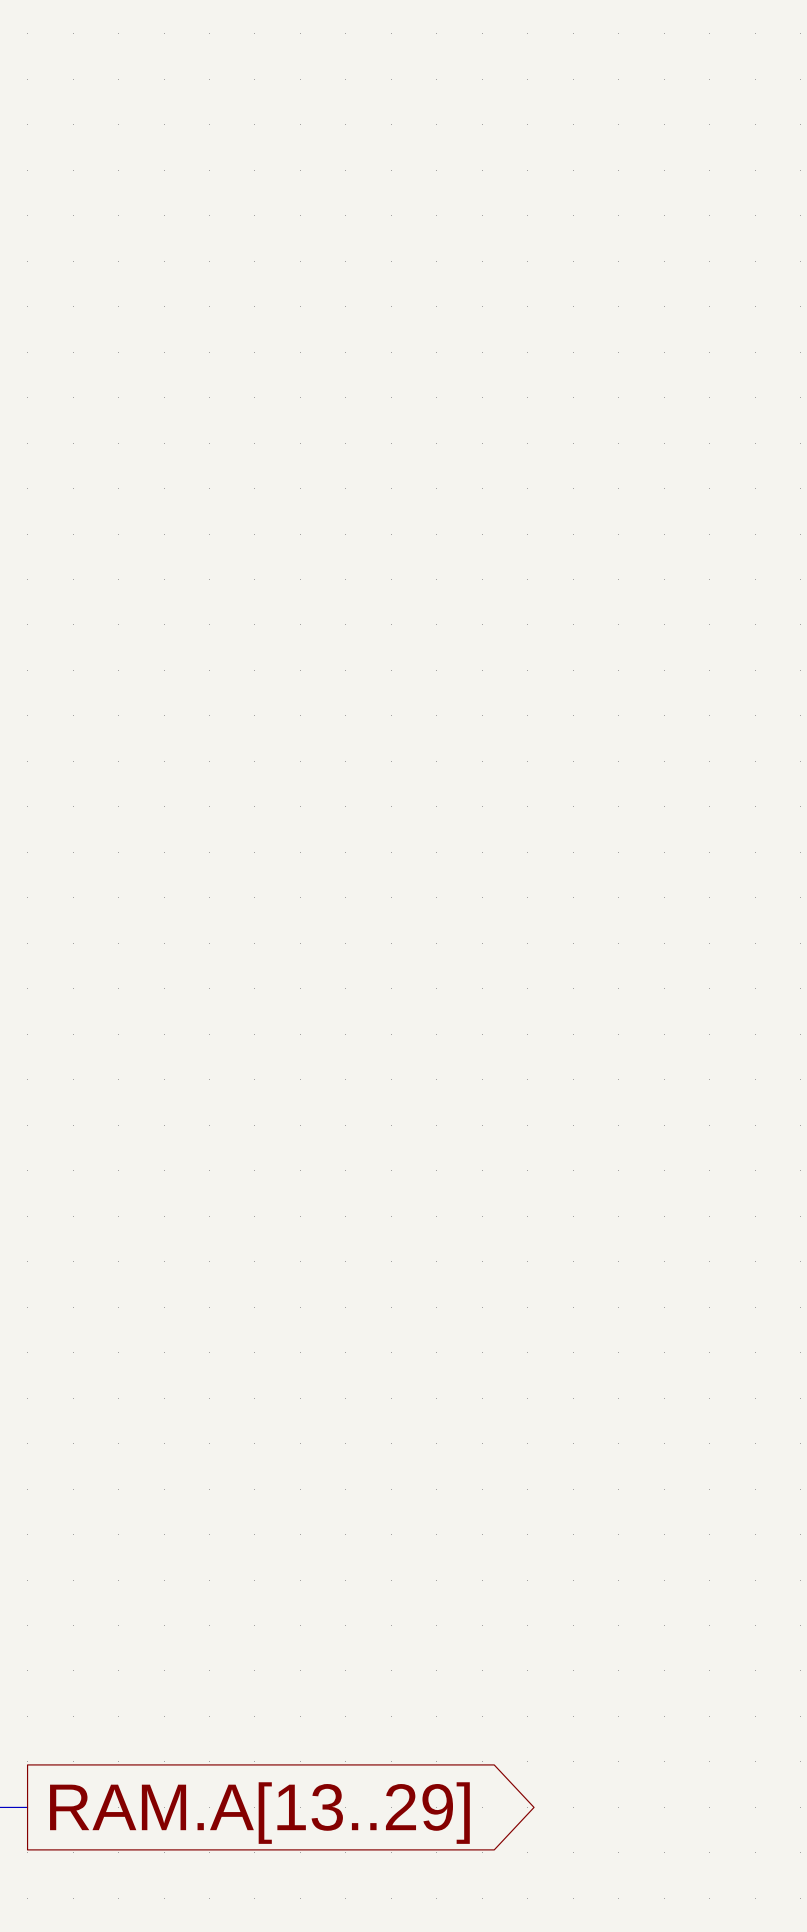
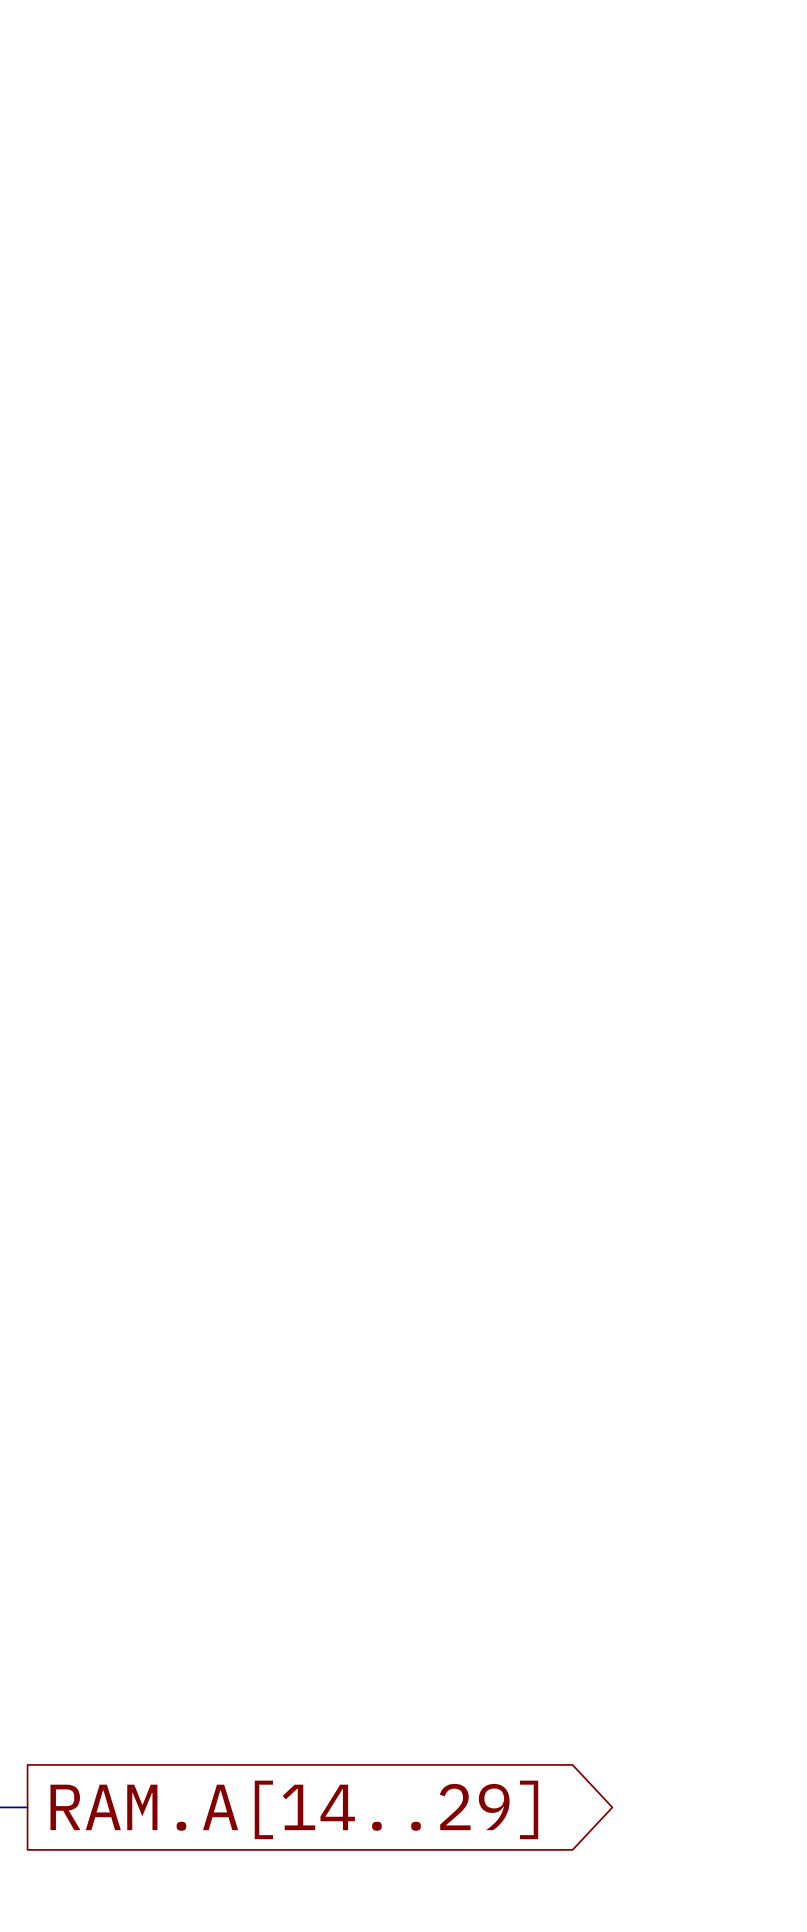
global label: RAM.A[13..29] (259, 1813) -> RAM.A[14..29] (294, 1809)

